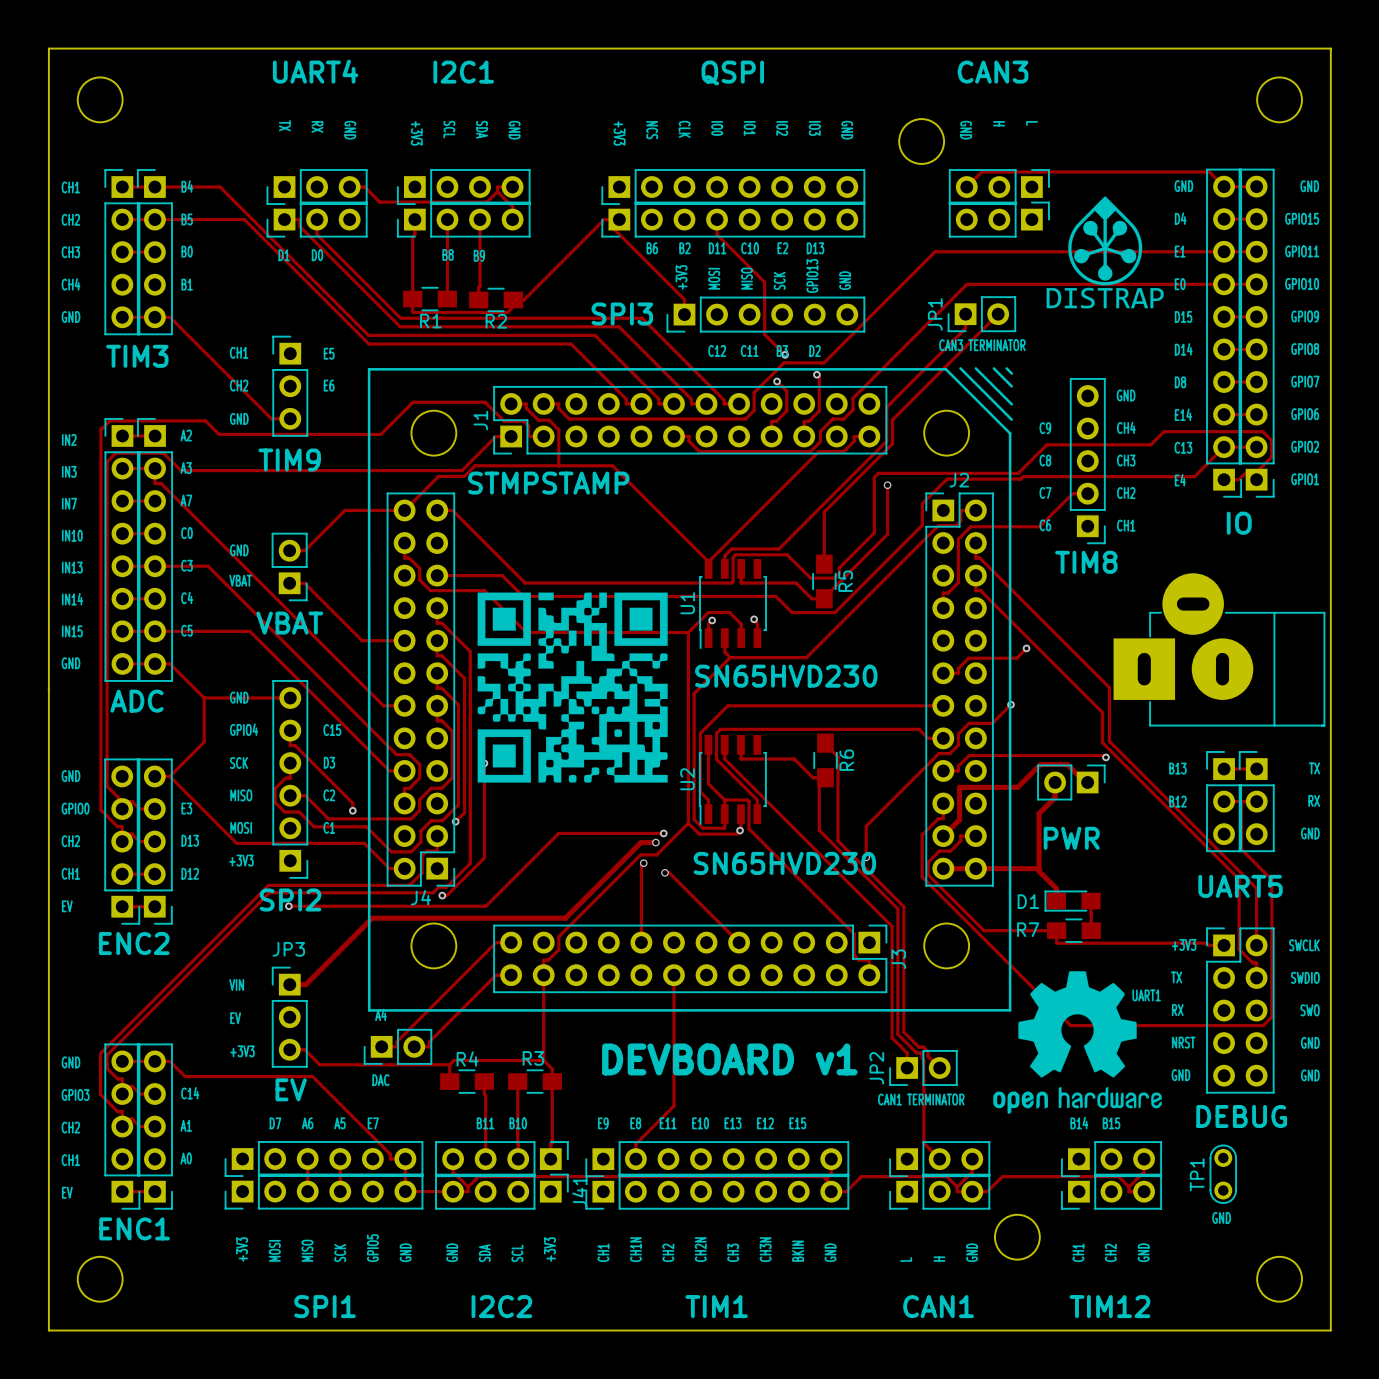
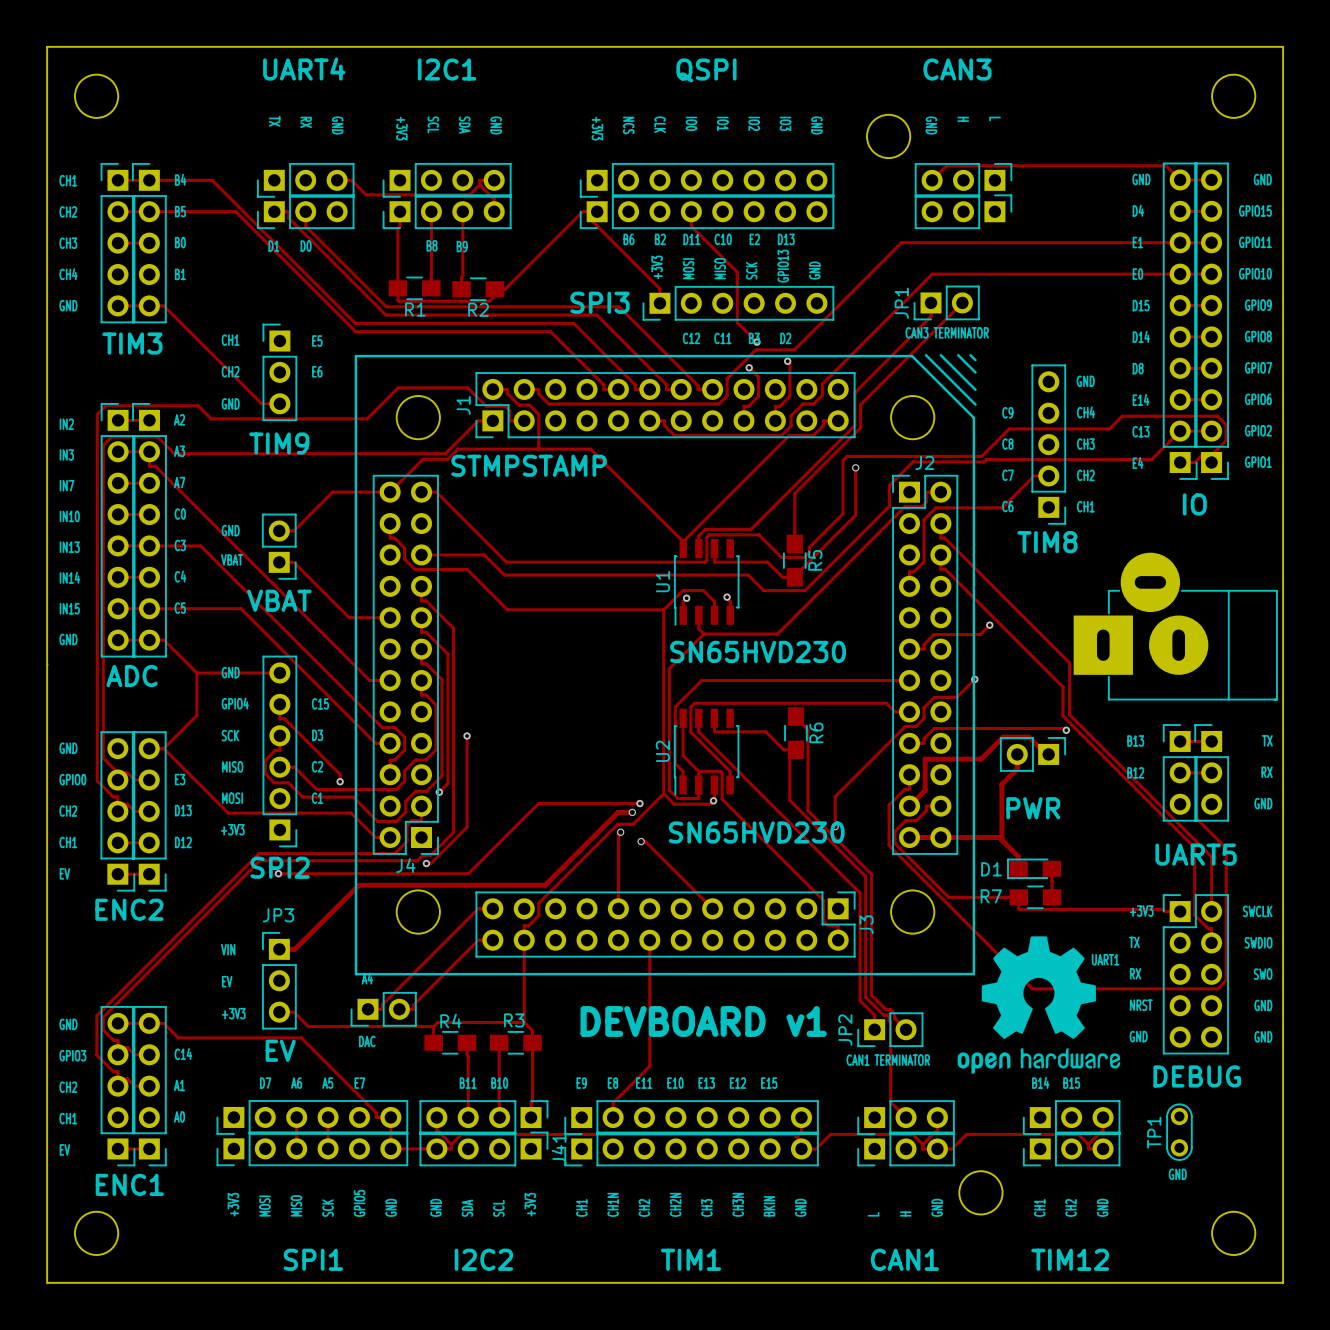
drawing: [1046, 196, 1164, 309] -> none
drawing: [477, 592, 668, 783] -> none

